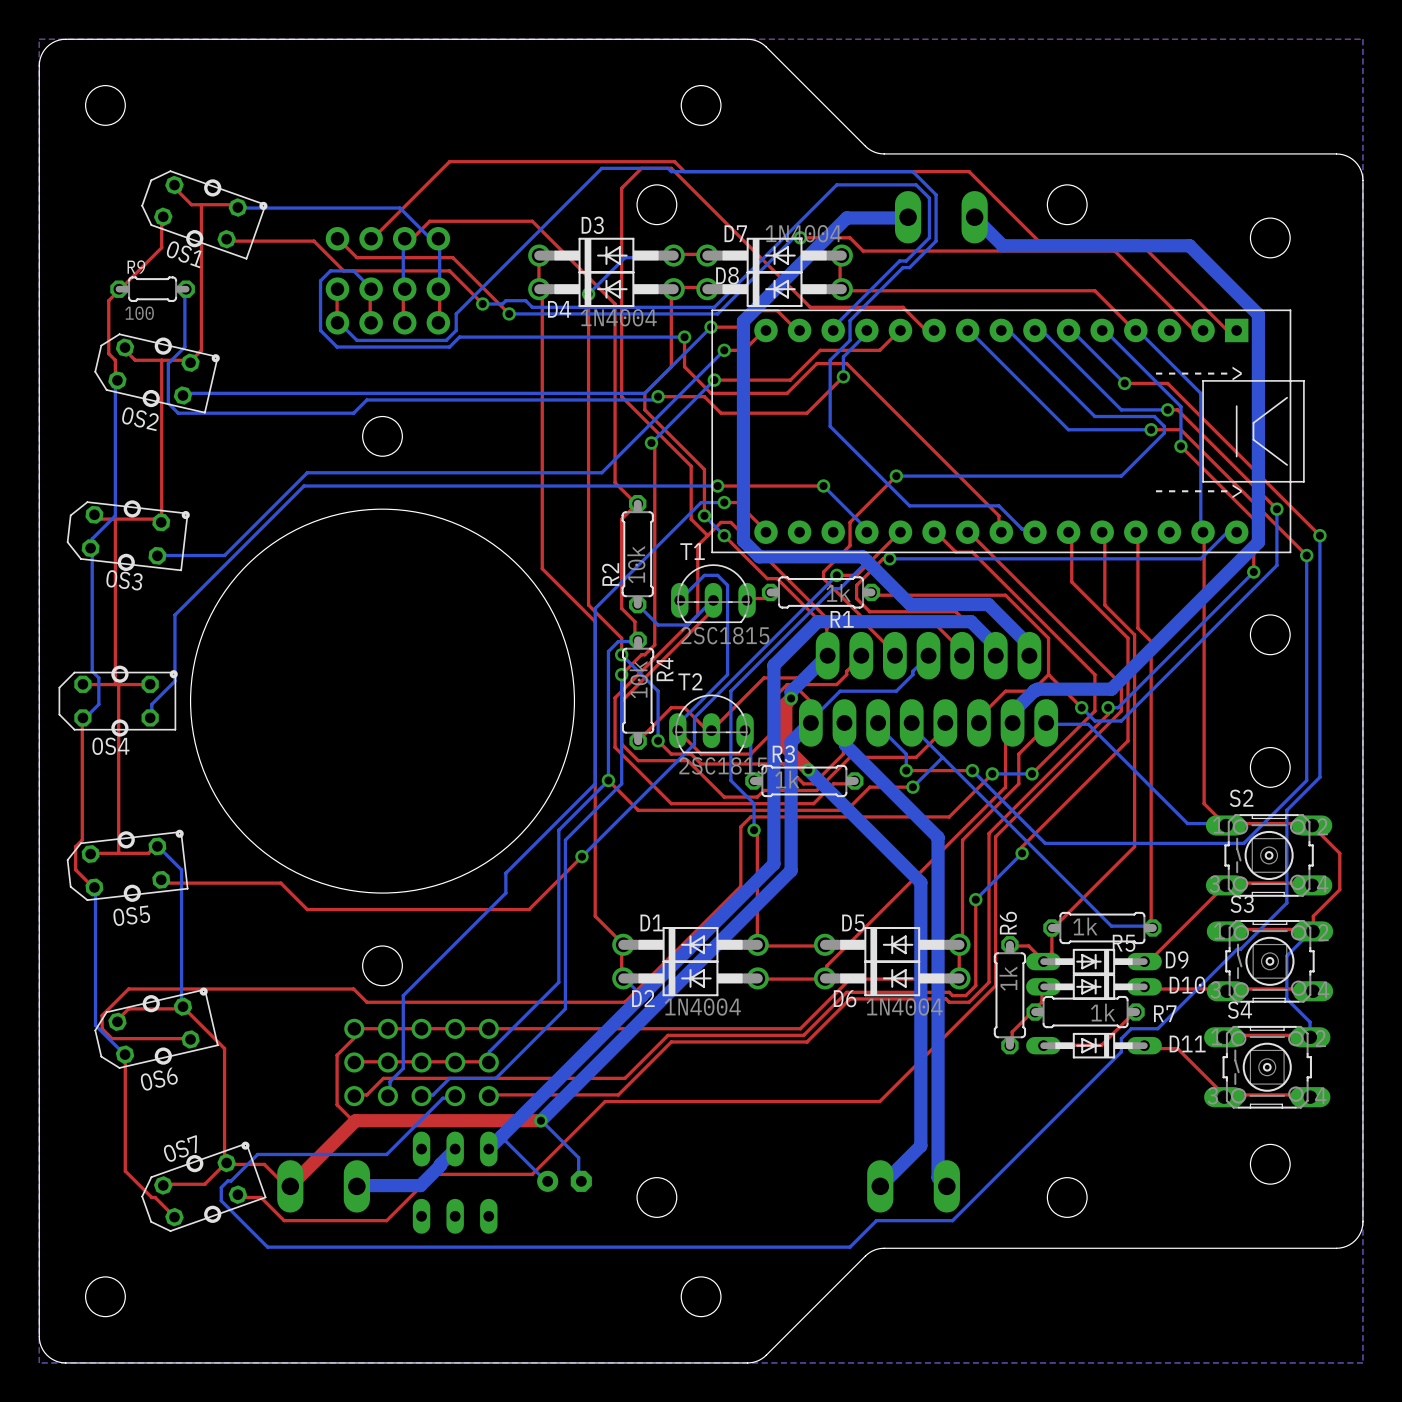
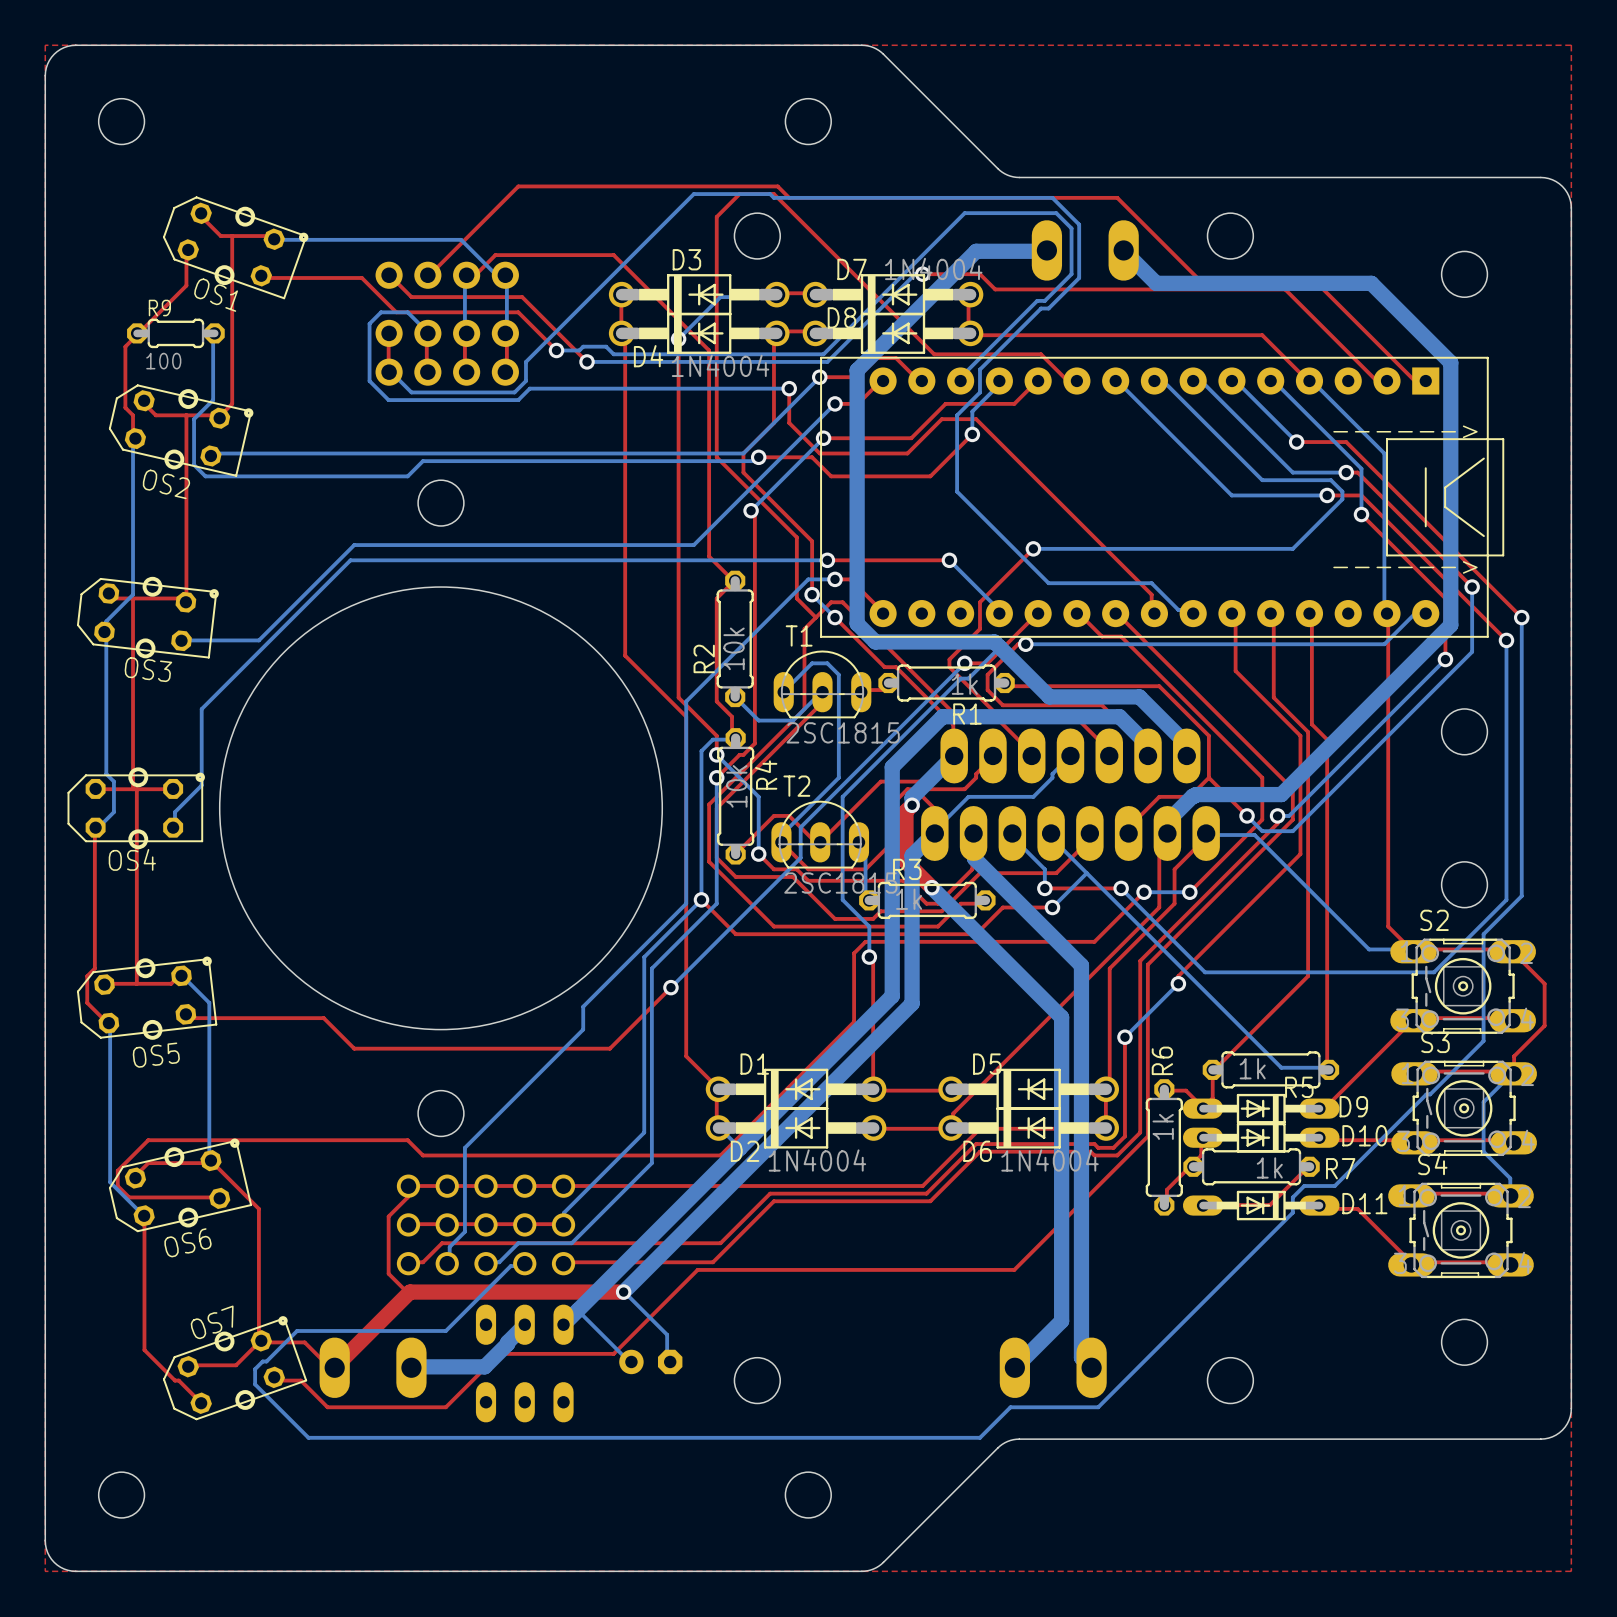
bottom zone outline: (1362, 39) (39, 39) (39, 1362) (1362, 1362) (1362, 39) -> none

